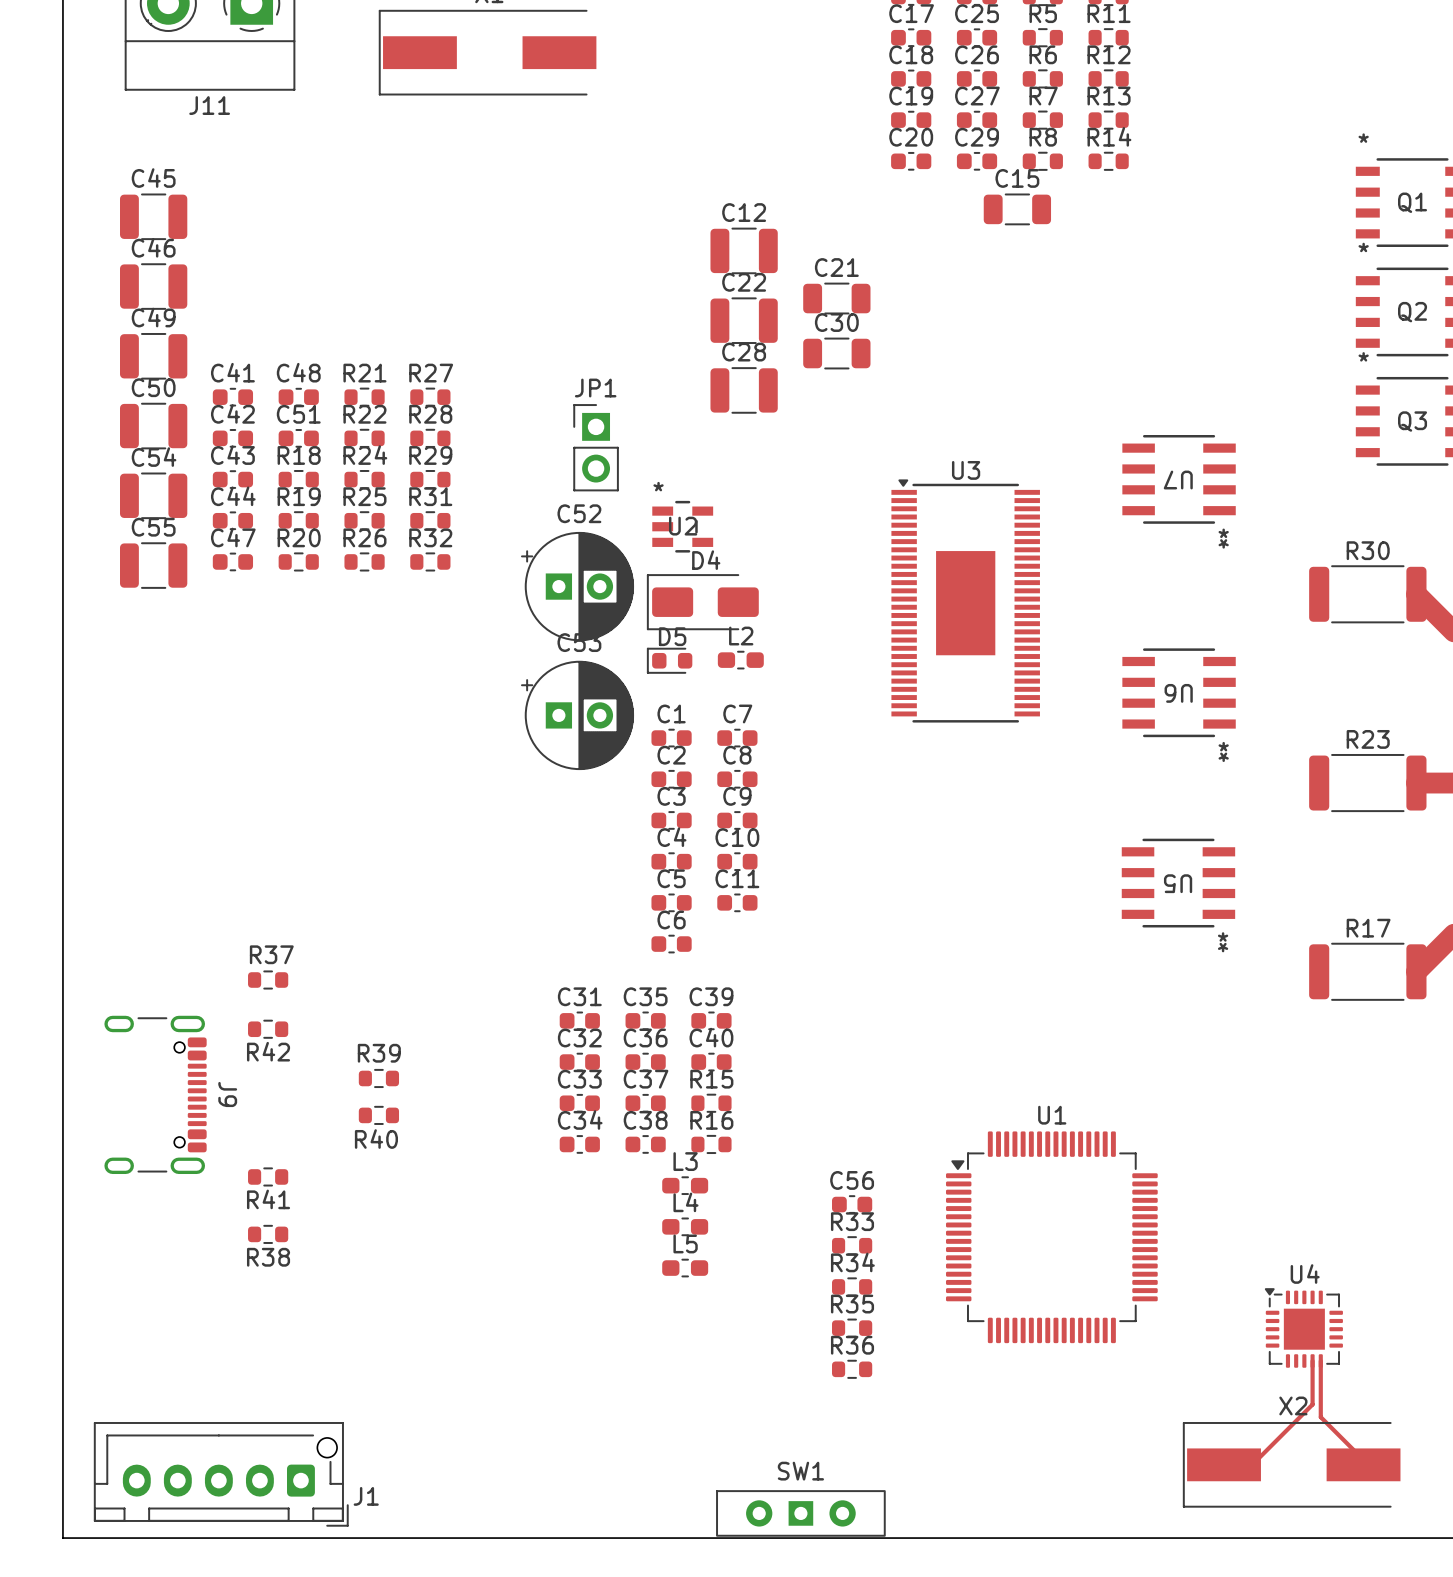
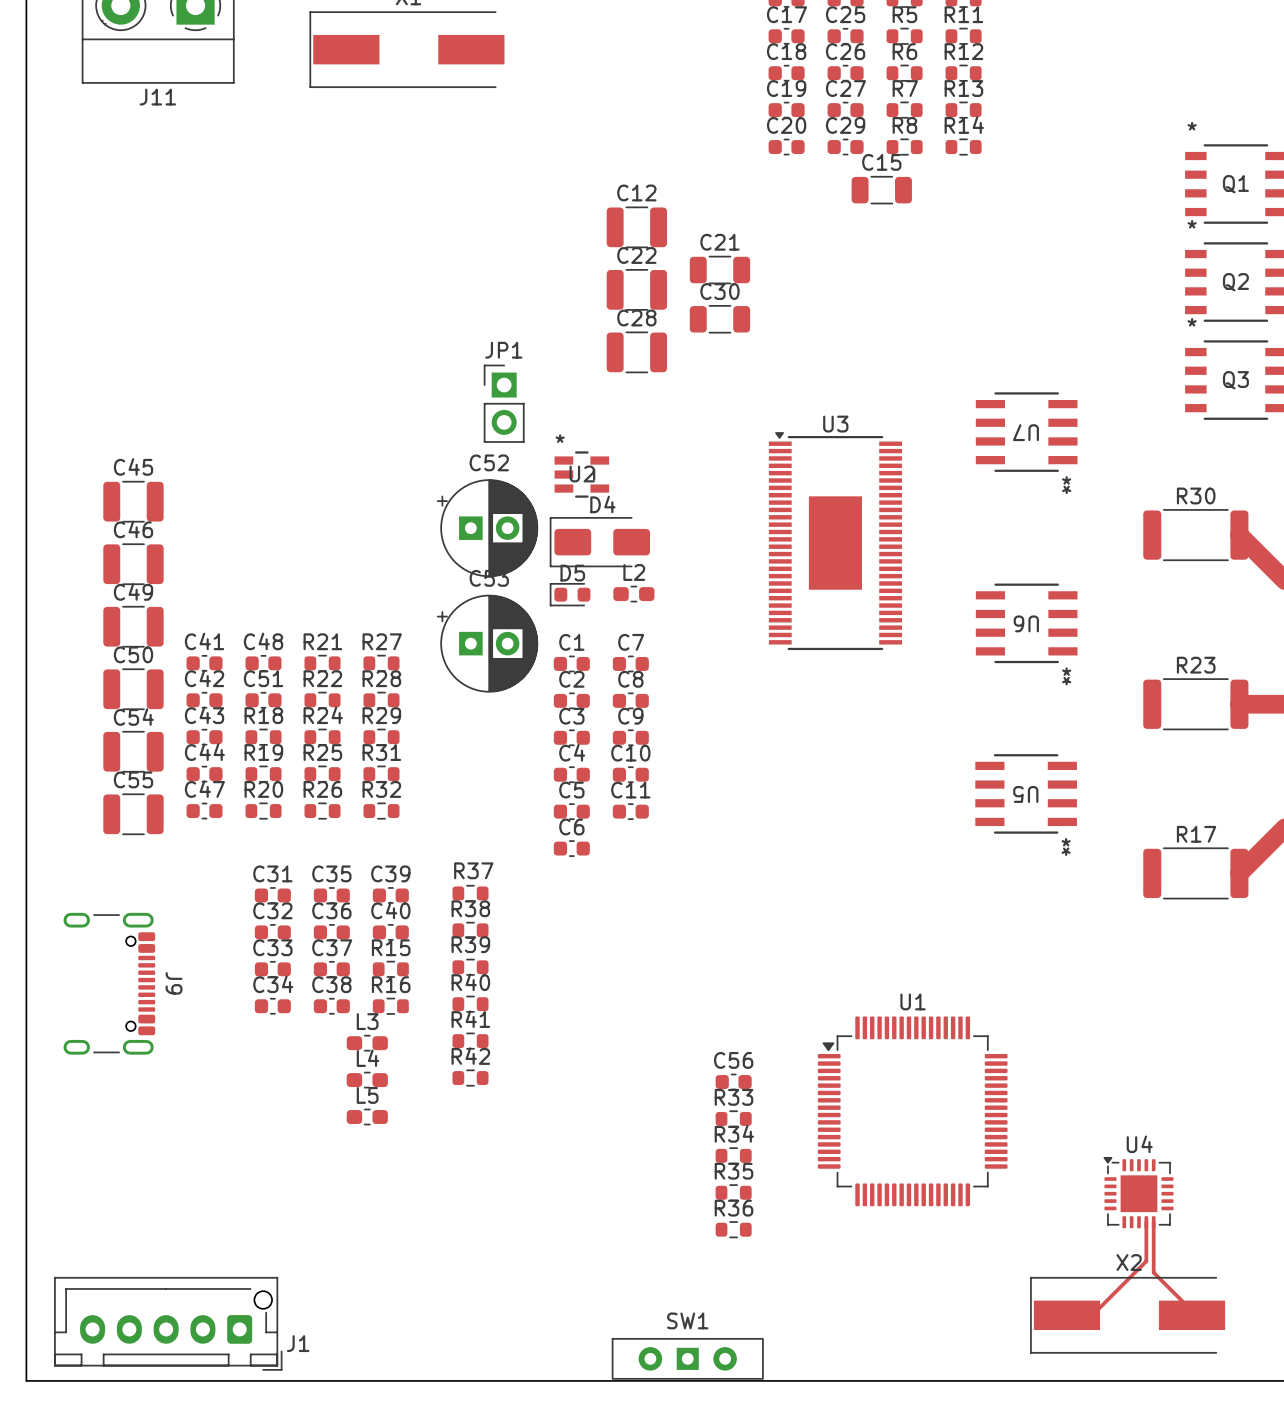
C45 position: (153, 216) -> (133, 501)
C46 position: (153, 286) -> (133, 564)
C49 position: (153, 356) -> (133, 626)
C41 position: (232, 397) -> (204, 663)
C48 position: (298, 397) -> (263, 663)
R21 position: (364, 397) -> (322, 663)
R27 position: (430, 397) -> (381, 663)
C50 position: (153, 426) -> (133, 689)
C42 position: (232, 438) -> (204, 700)
C51 position: (298, 438) -> (263, 700)
R22 position: (364, 438) -> (322, 700)
R28 position: (430, 438) -> (381, 700)
C43 position: (232, 479) -> (204, 737)
R18 position: (298, 479) -> (263, 737)
R24 position: (364, 479) -> (322, 737)
R29 position: (430, 479) -> (381, 737)
C54 position: (153, 495) -> (133, 751)
C44 position: (232, 520) -> (204, 774)
R19 position: (298, 520) -> (263, 774)
R25 position: (364, 520) -> (322, 774)
R31 position: (430, 520) -> (381, 774)
C47 position: (232, 561) -> (204, 811)
R20 position: (298, 561) -> (263, 811)
R26 position: (364, 561) -> (322, 811)
R32 position: (430, 561) -> (381, 811)
C55 position: (153, 565) -> (133, 814)
R37 position: (268, 980) -> (470, 893)
C31 position: (579, 1020) -> (272, 895)
C35 position: (645, 1020) -> (331, 895)
C39 position: (711, 1020) -> (390, 895)
R42 position: (268, 1029) -> (470, 1078)
R42 name position: R42 (268, 1051) -> R42 (470, 1056)
C32 position: (579, 1062) -> (272, 932)
C36 position: (645, 1062) -> (331, 932)
C40 position: (711, 1062) -> (390, 932)
R39 position: (378, 1078) -> (470, 967)
C33 position: (579, 1103) -> (272, 969)
C37 position: (645, 1103) -> (331, 969)
R15 position: (711, 1103) -> (390, 969)
R40 position: (378, 1115) -> (470, 1004)
R40 name position: R40 (376, 1139) -> R40 (470, 982)
C34 position: (579, 1144) -> (272, 1006)
C38 position: (645, 1144) -> (331, 1006)
R16 position: (711, 1144) -> (390, 1006)
R41 position: (268, 1176) -> (470, 1041)
L3 position: (685, 1185) -> (367, 1043)
R41 name position: R41 (268, 1199) -> R41 (470, 1019)
L4 position: (685, 1226) -> (367, 1080)
R38 position: (268, 1234) -> (470, 930)
R38 name position: R38 (268, 1257) -> R38 (470, 908)
L5 position: (685, 1268) -> (367, 1117)

